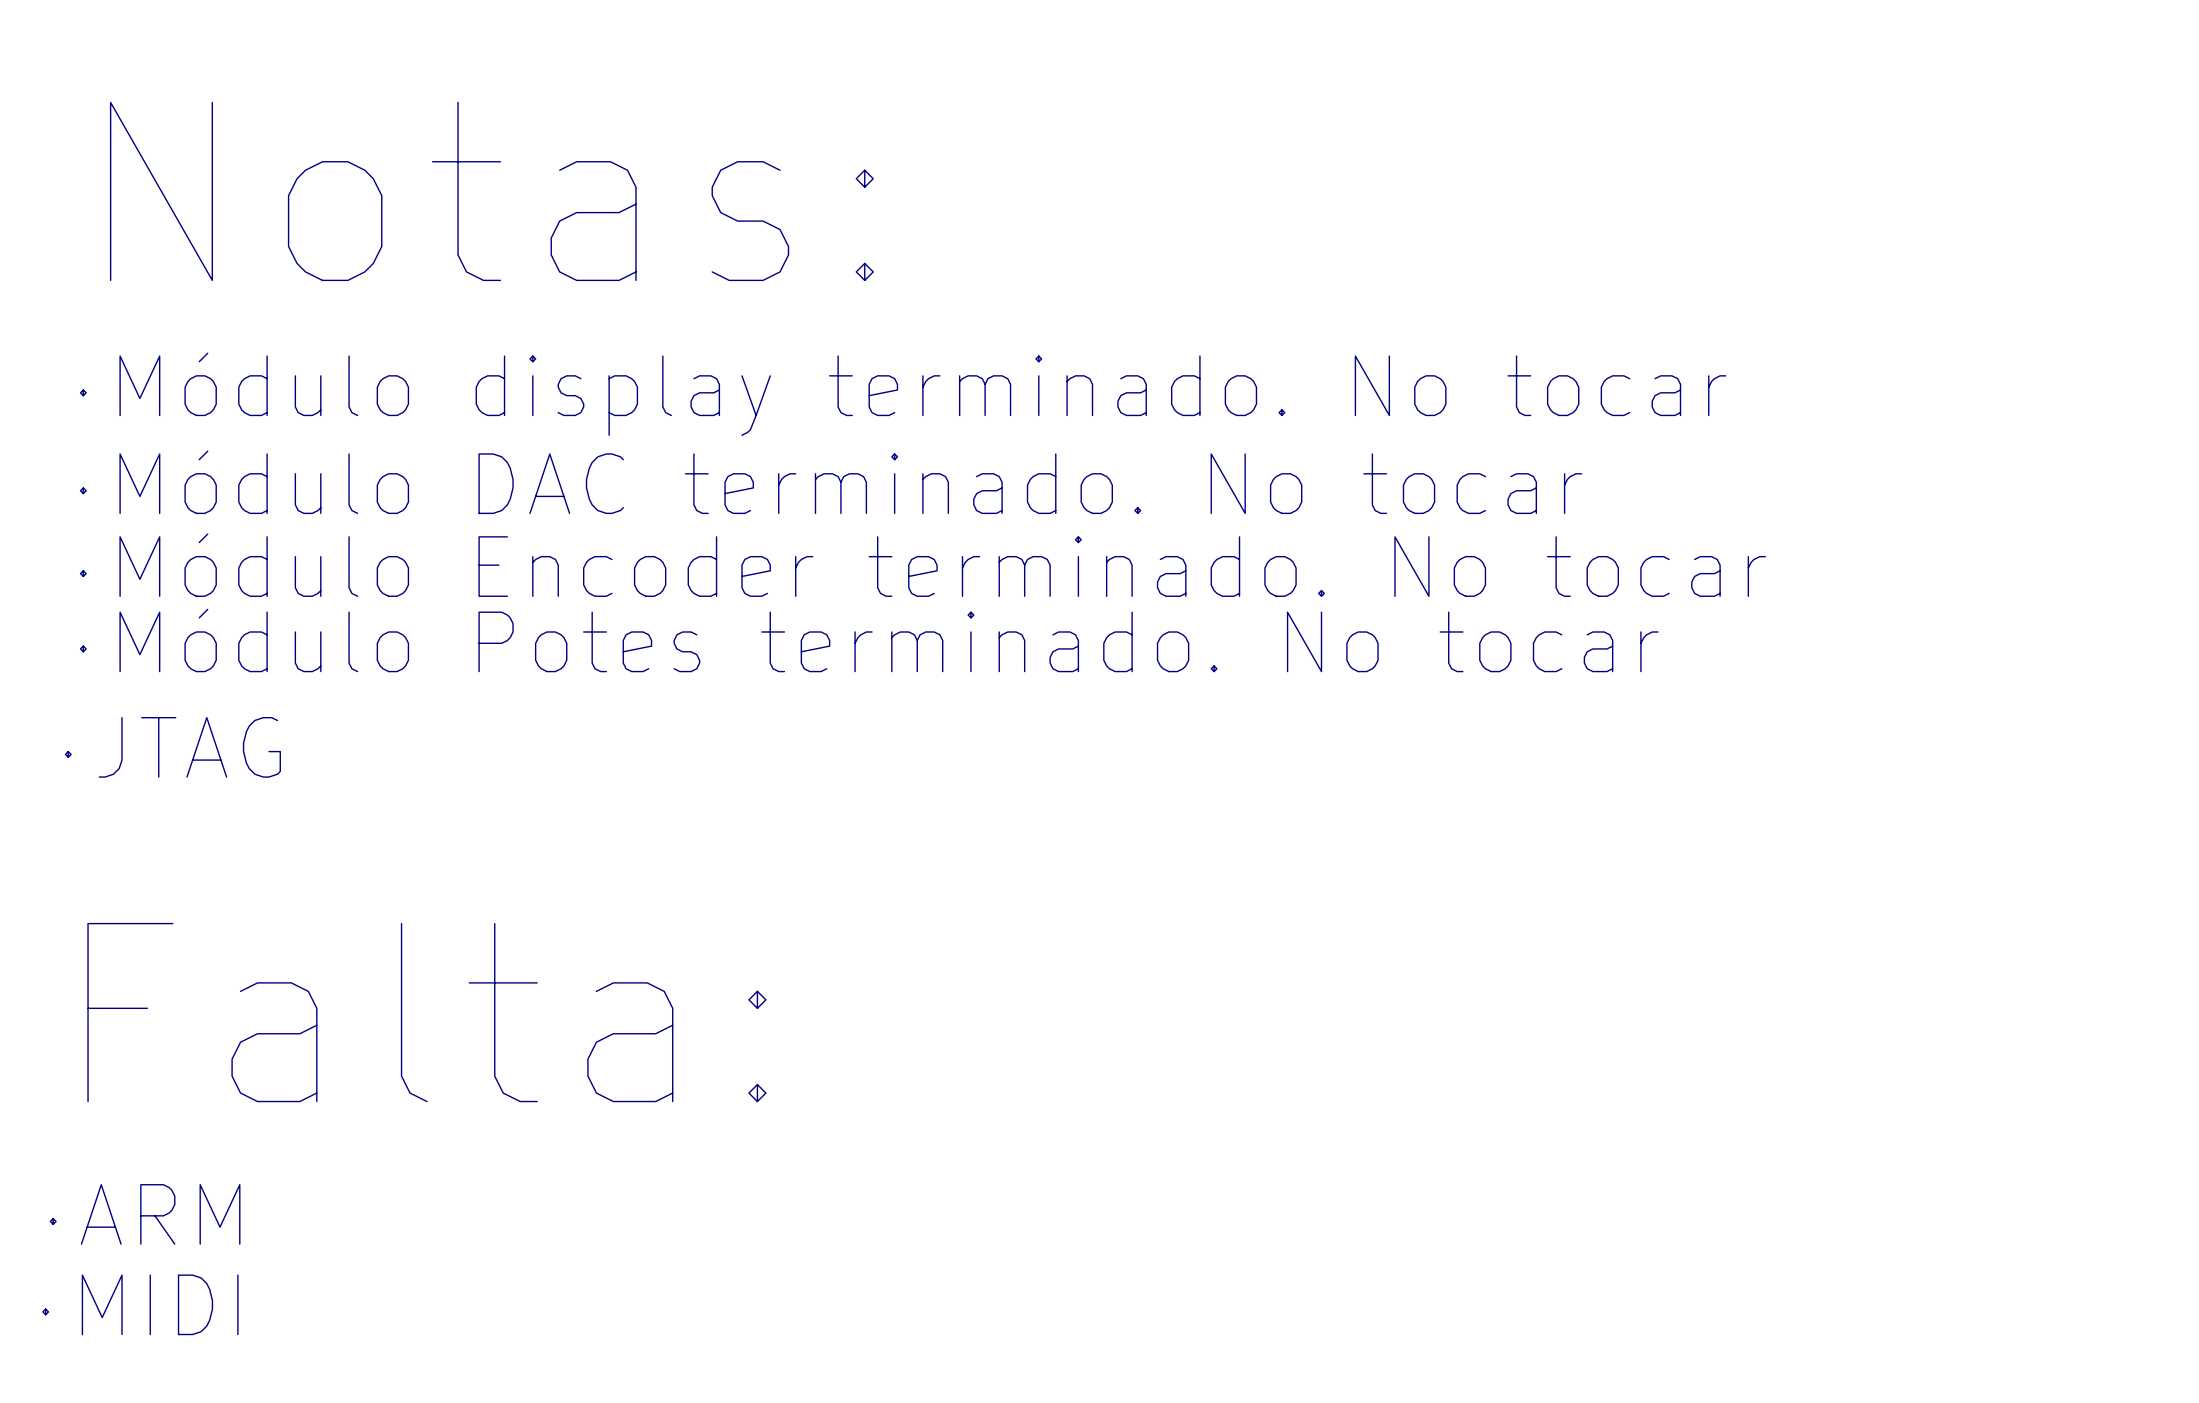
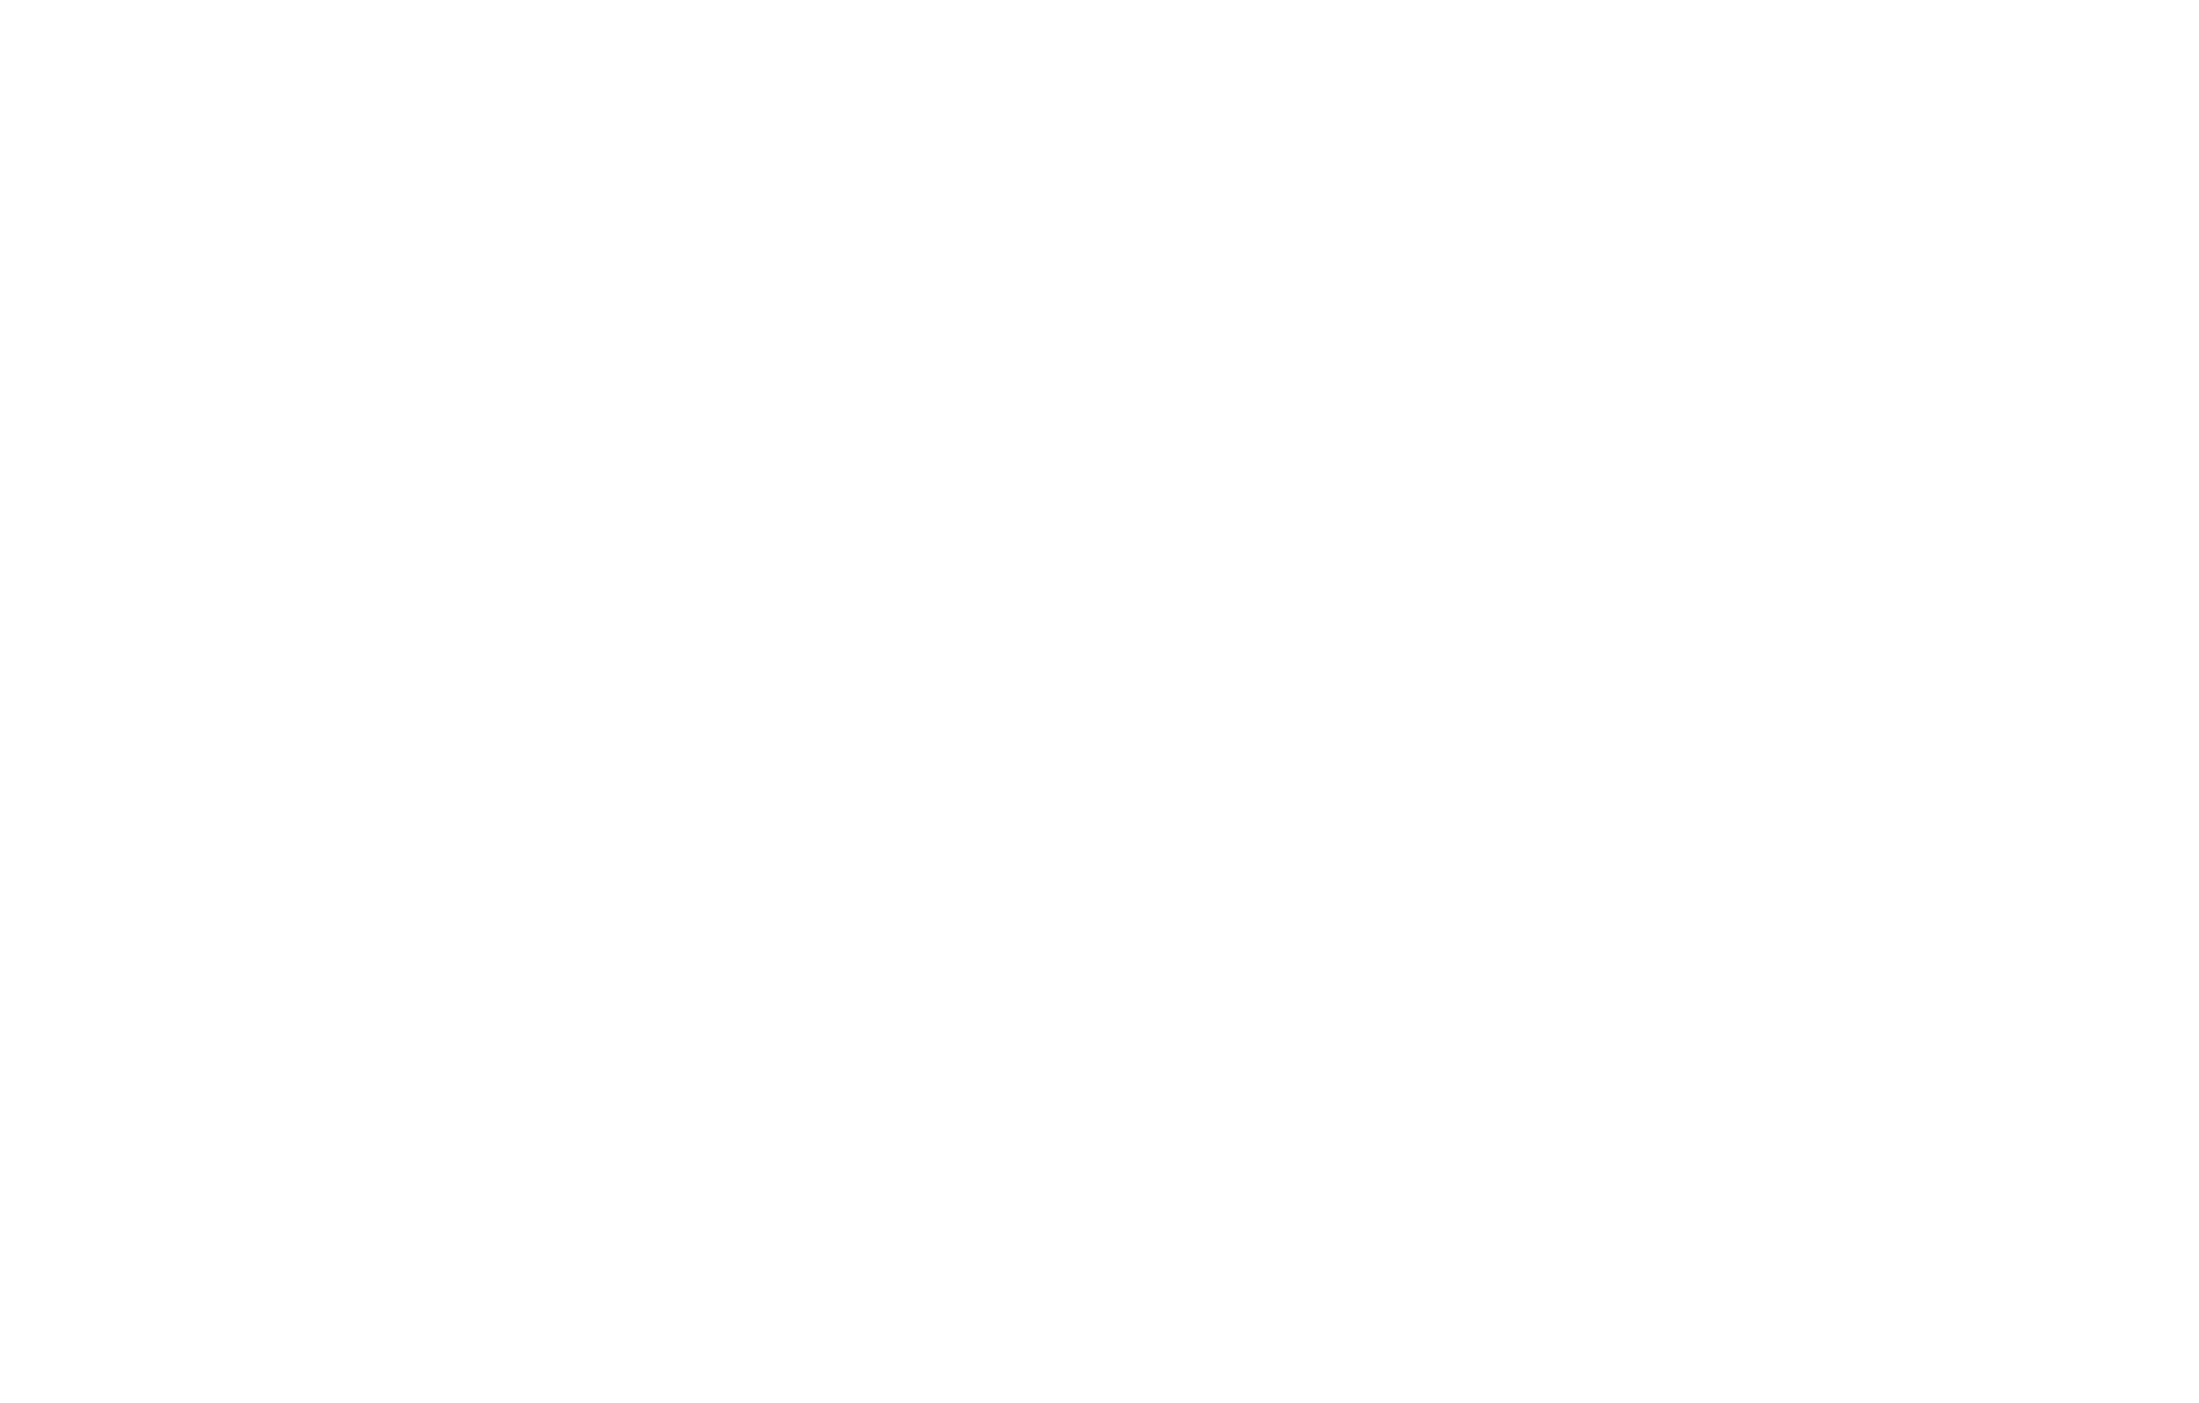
text: Notas: (491, 191) -> none
text: ·Módulo display terminado. No tocar (903, 394) -> none
text: ·Módulo DAC terminado. No tocar (831, 482) -> none
text: ·Módulo Encoder terminado. No tocar (922, 565) -> none
text: ·Módulo Potes terminado. No tocar (869, 640) -> none
text: ·JTAG (172, 747) -> none
text: Falta: (426, 1012) -> none
text: ·ARM (145, 1214) -> none
text: ·MIDI (140, 1304) -> none

